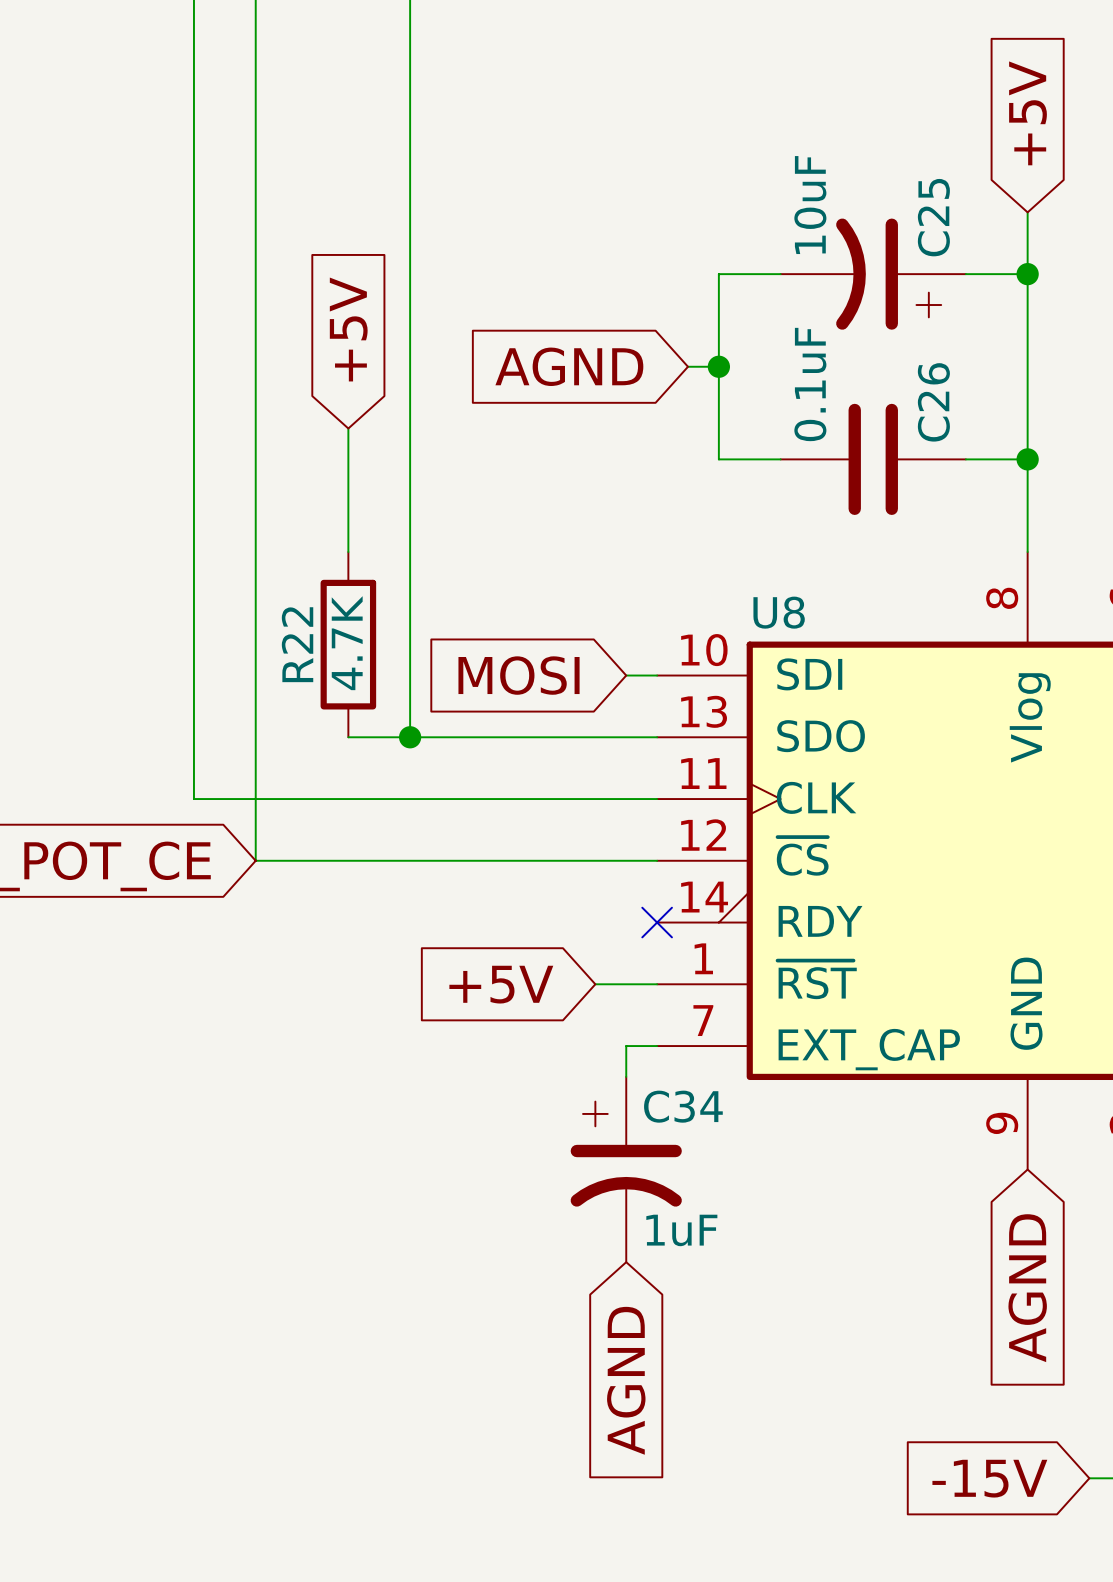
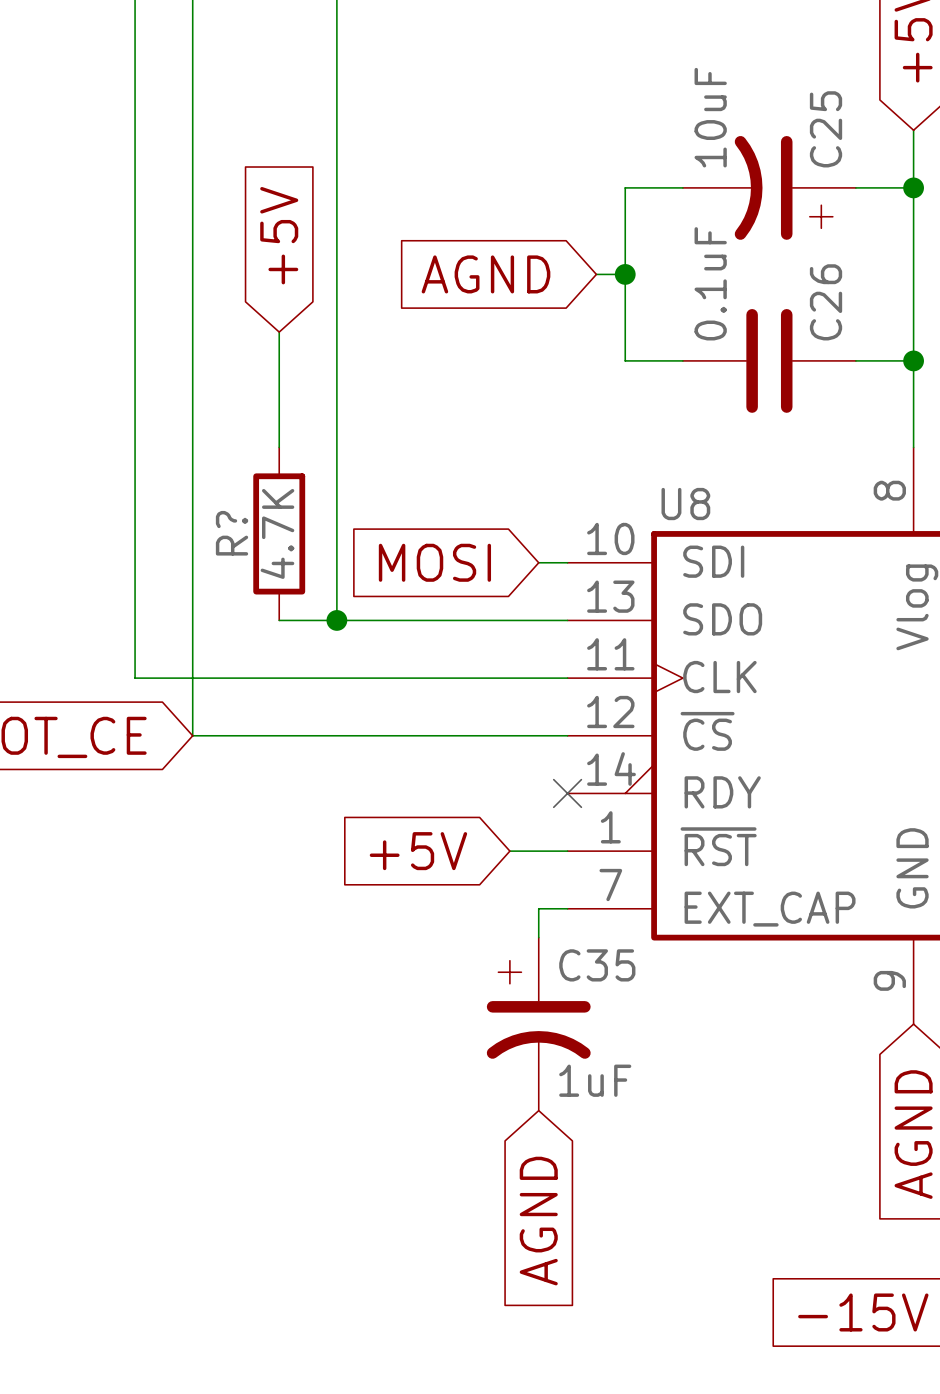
R22 name: R22 (297, 644) -> R? (232, 533)
C34 name: C34 (683, 1106) -> C35 (597, 965)

